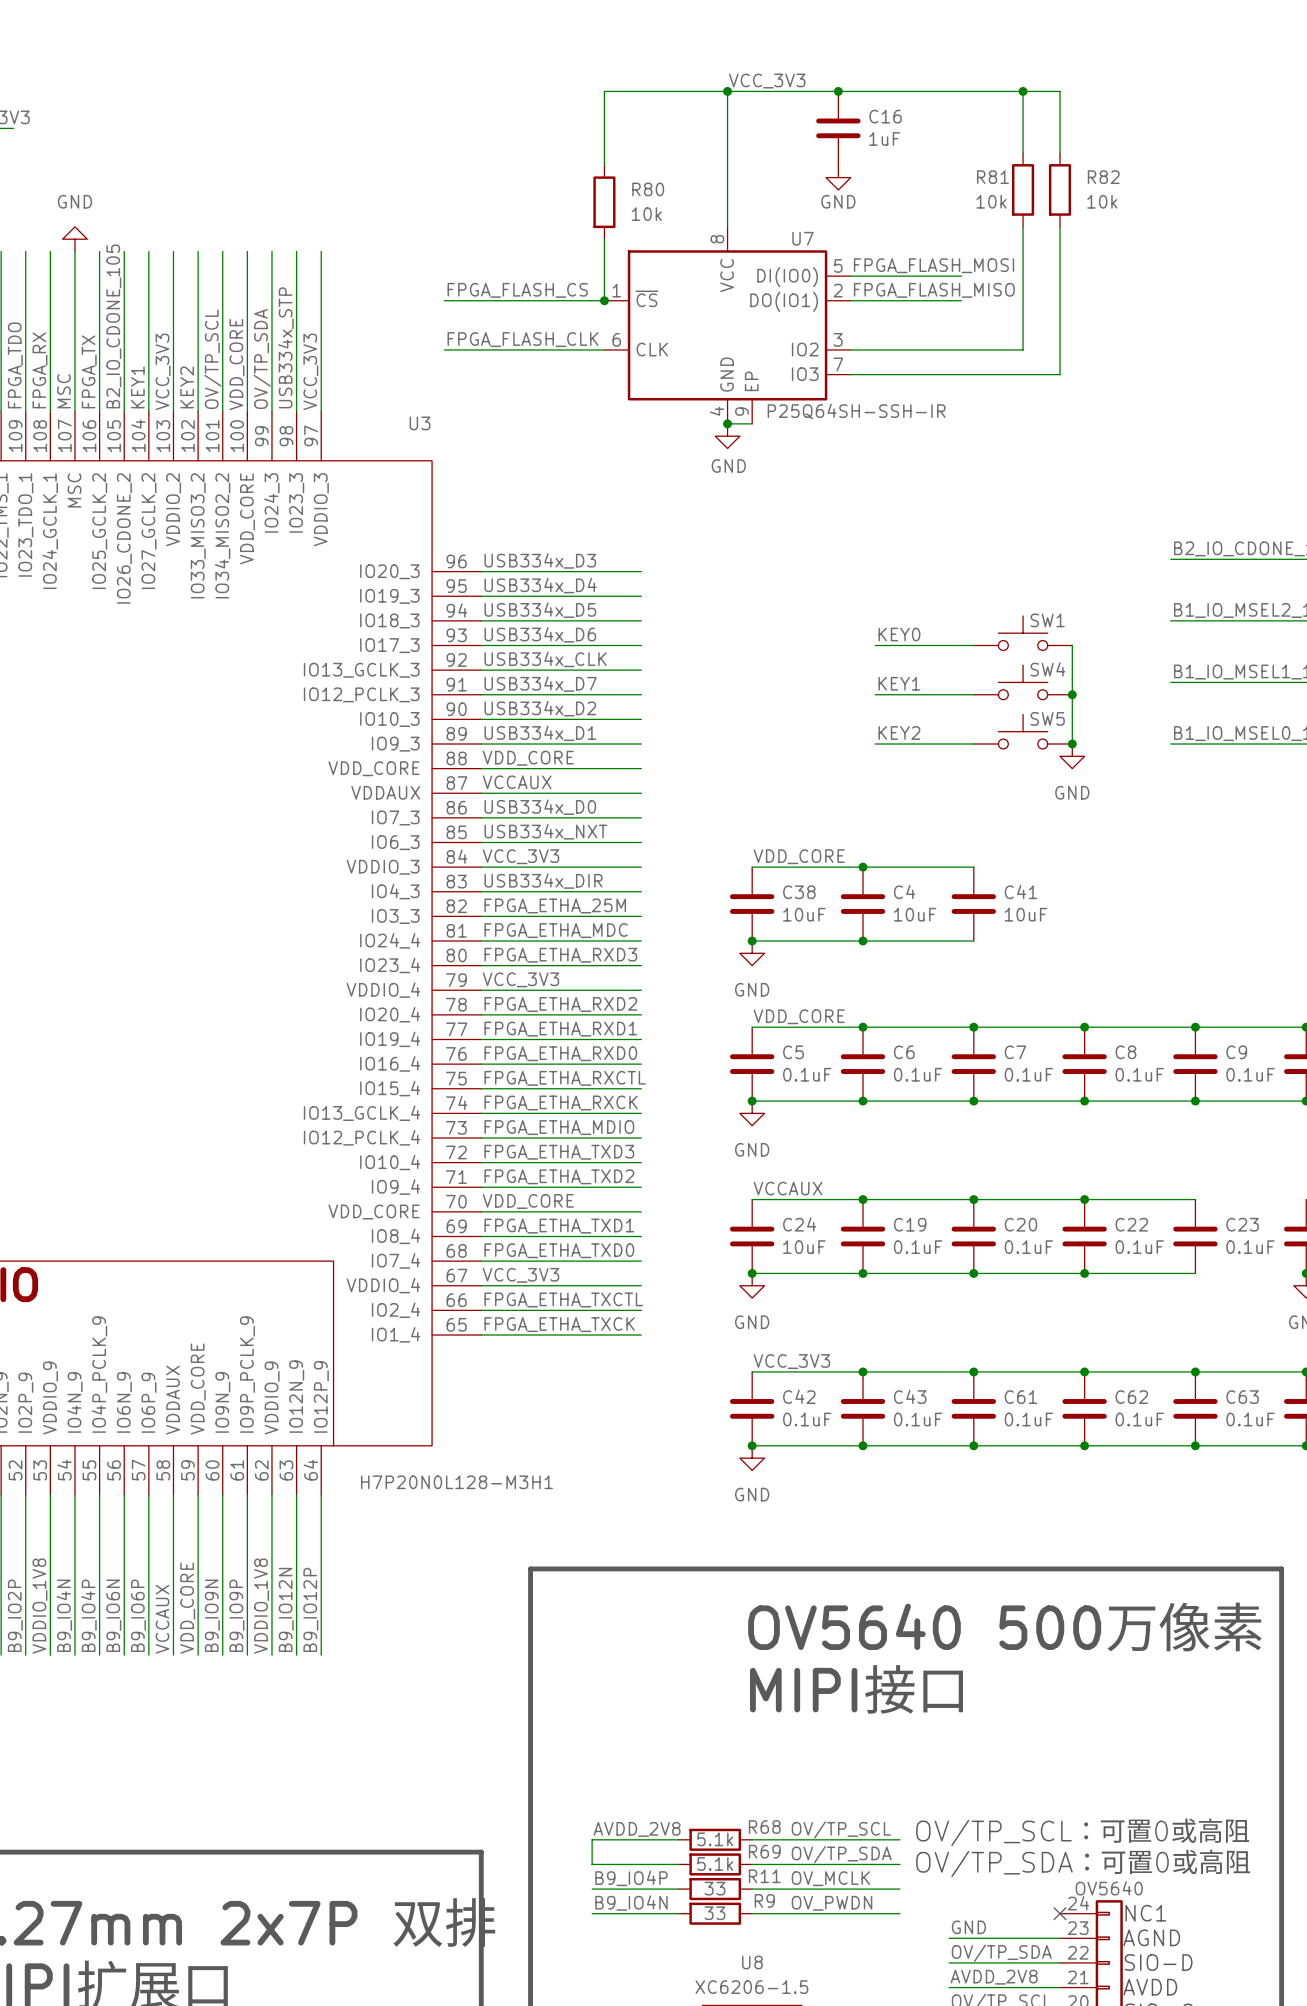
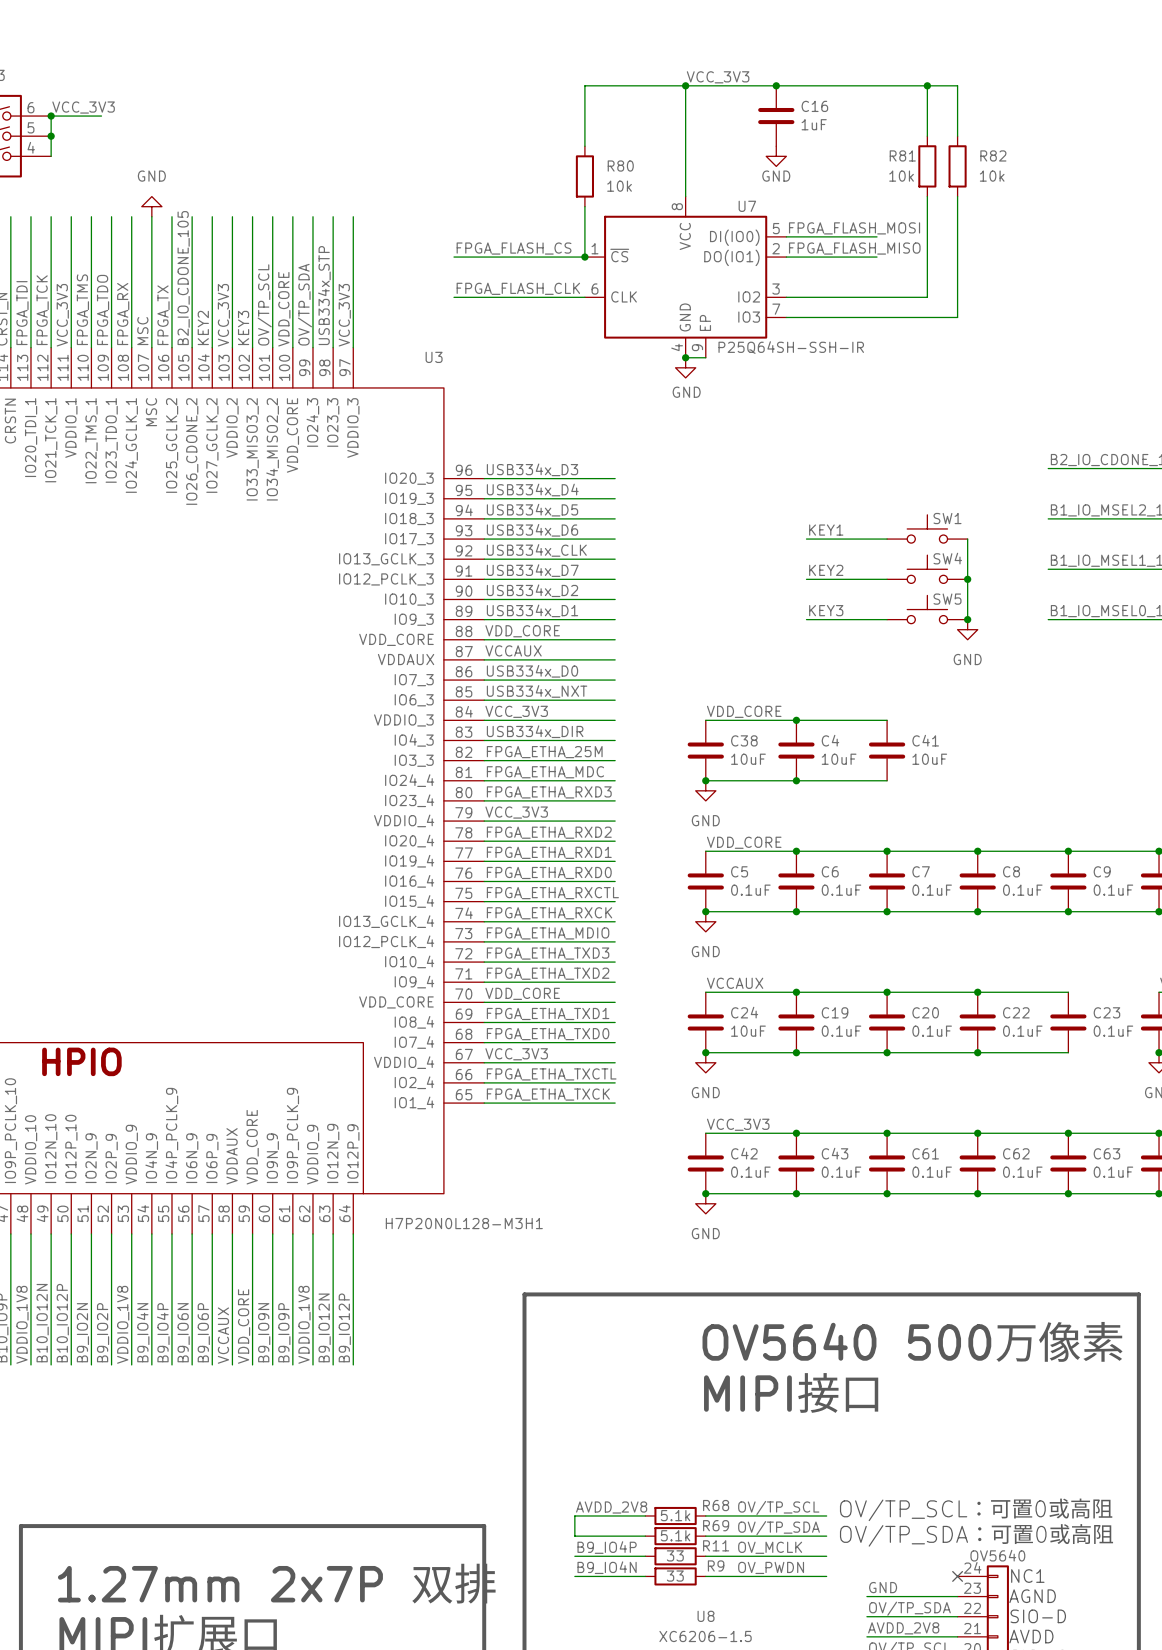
label: KEY1 (137, 387) -> KEY2 (203, 327)
label: KEY2 (187, 387) -> KEY3 (243, 327)
label: KEY0 (899, 634) -> KEY1 (826, 530)
label: KEY1 (899, 683) -> KEY2 (826, 570)
label: KEY2 (899, 733) -> KEY3 (826, 610)

